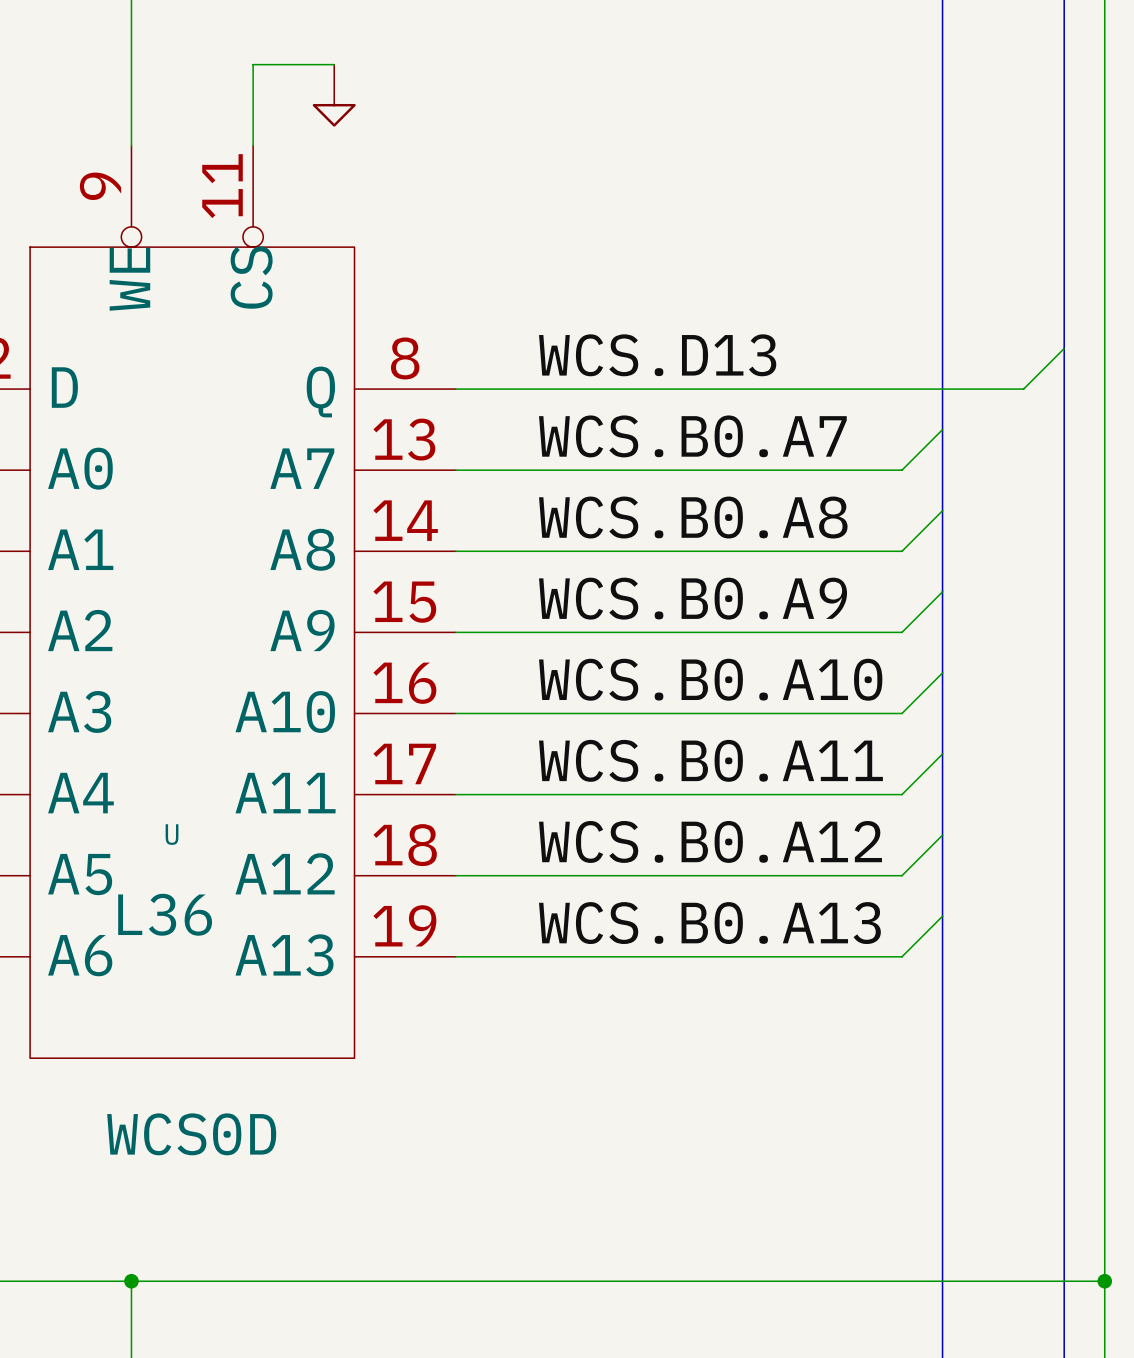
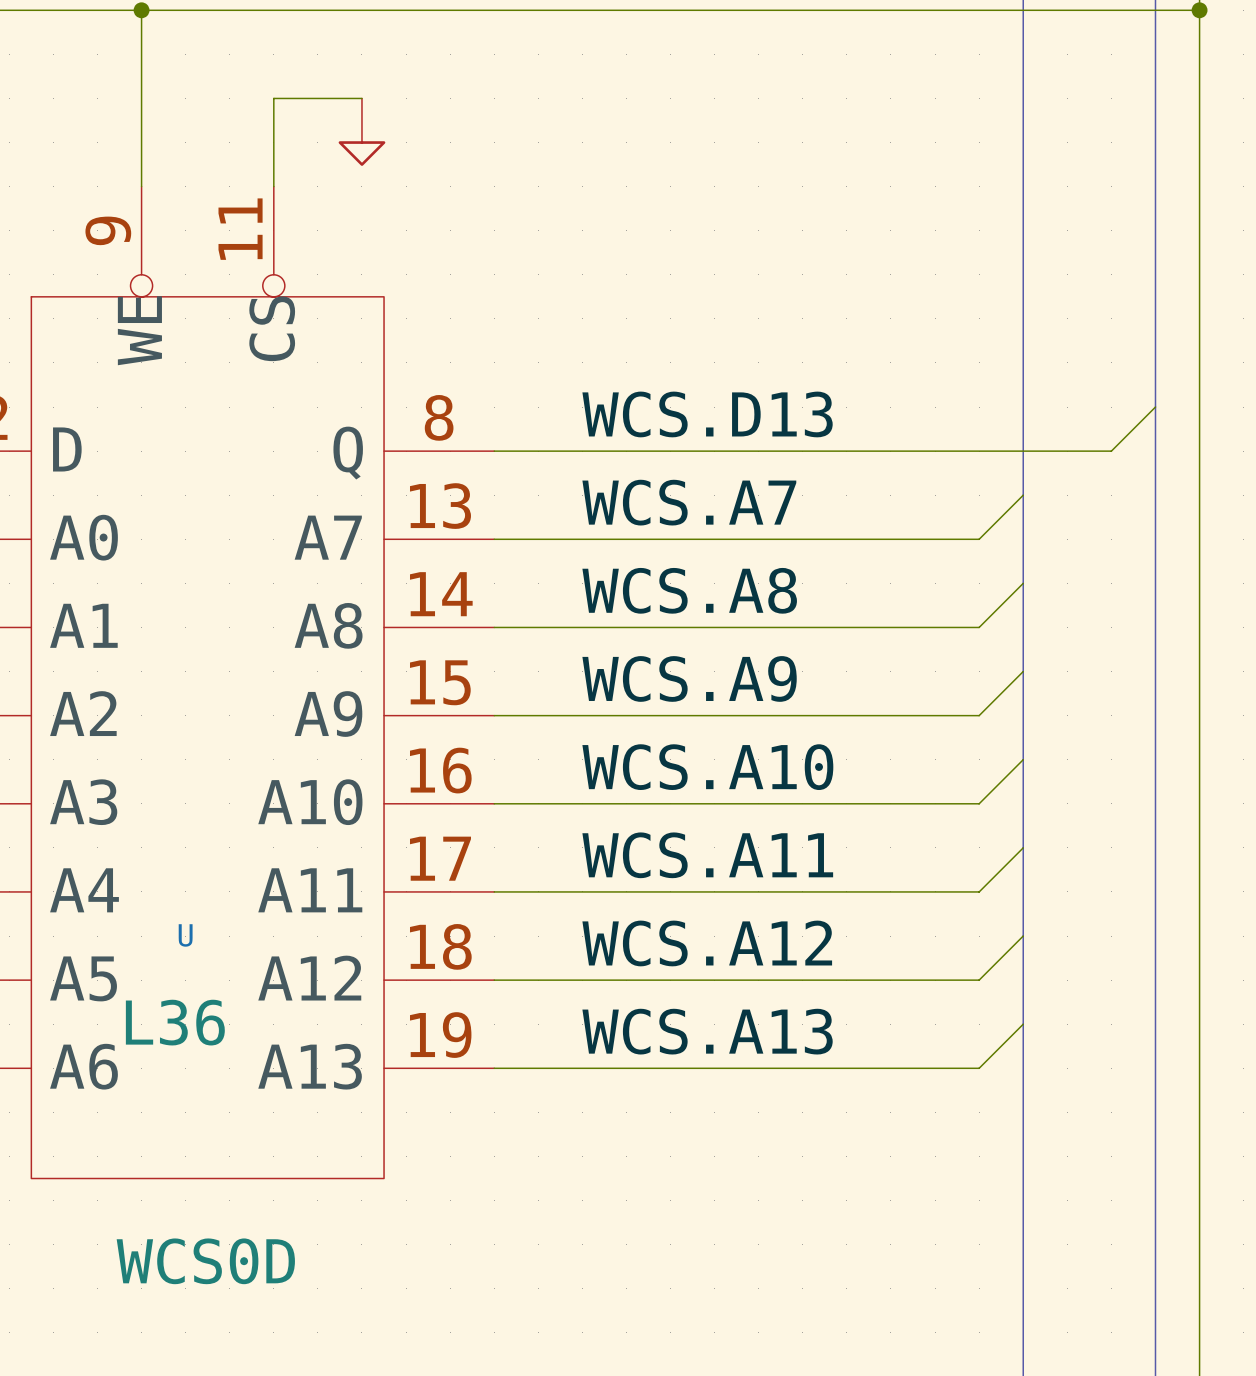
label: WCS.B0.A7 (692, 436) -> WCS.A7 (689, 502)
label: WCS.B0.A8 (693, 517) -> WCS.A8 (689, 590)
label: WCS.B0.A9 (693, 598) -> WCS.A9 (689, 678)
label: WCS.B0.A10 (710, 679) -> WCS.A10 (707, 767)
label: WCS.B0.A11 (710, 760) -> WCS.A11 (707, 855)
label: WCS.B0.A12 (710, 841) -> WCS.A12 (707, 943)
label: WCS.B0.A13 (709, 923) -> WCS.A13 (707, 1031)

